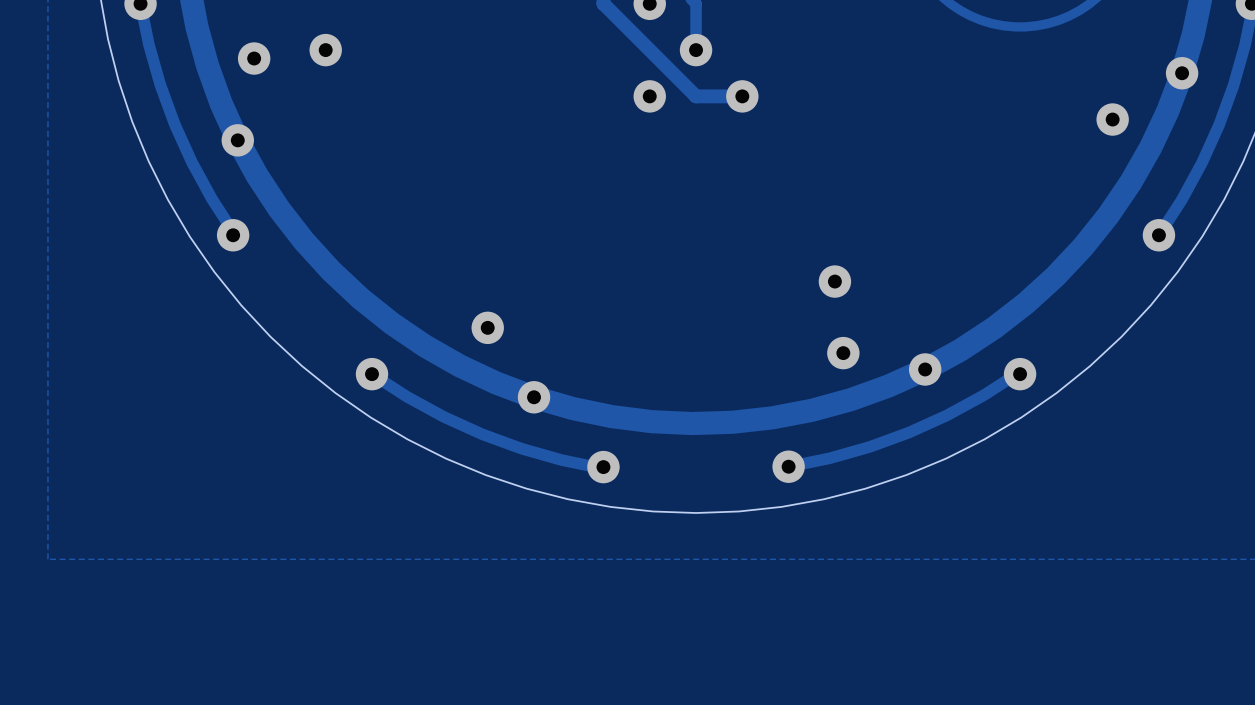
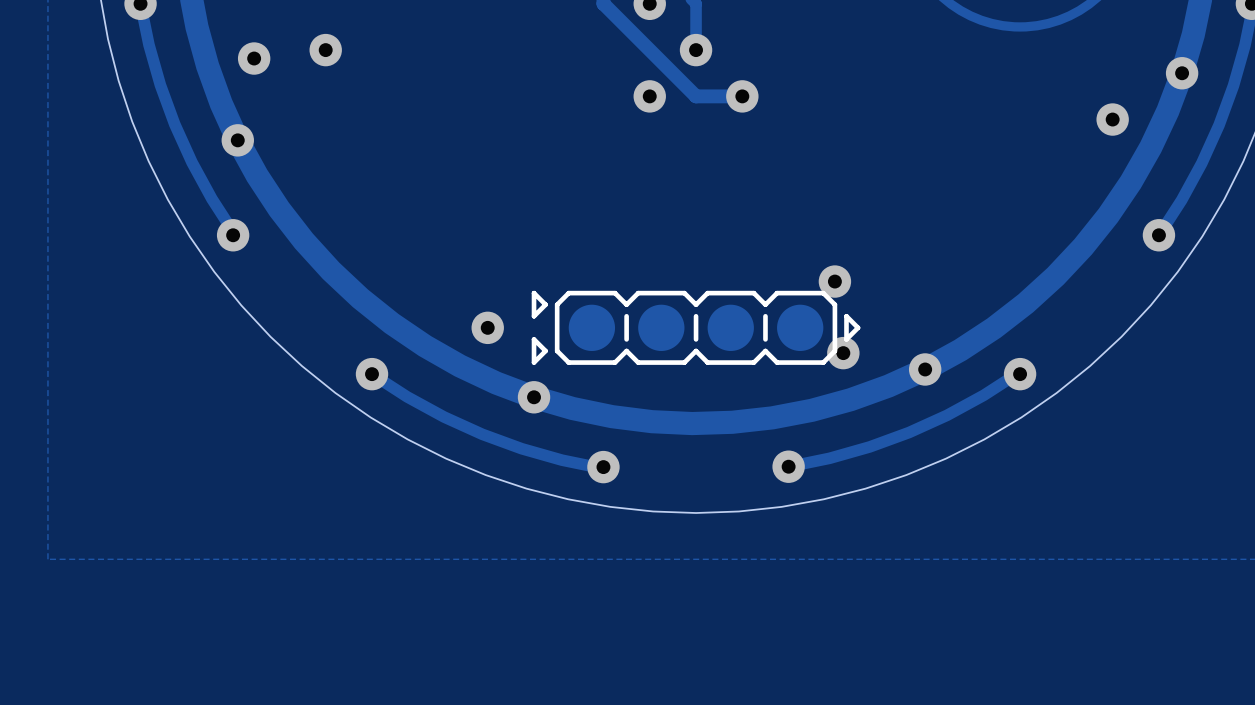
drawing: none -> [531, 290, 861, 365]

